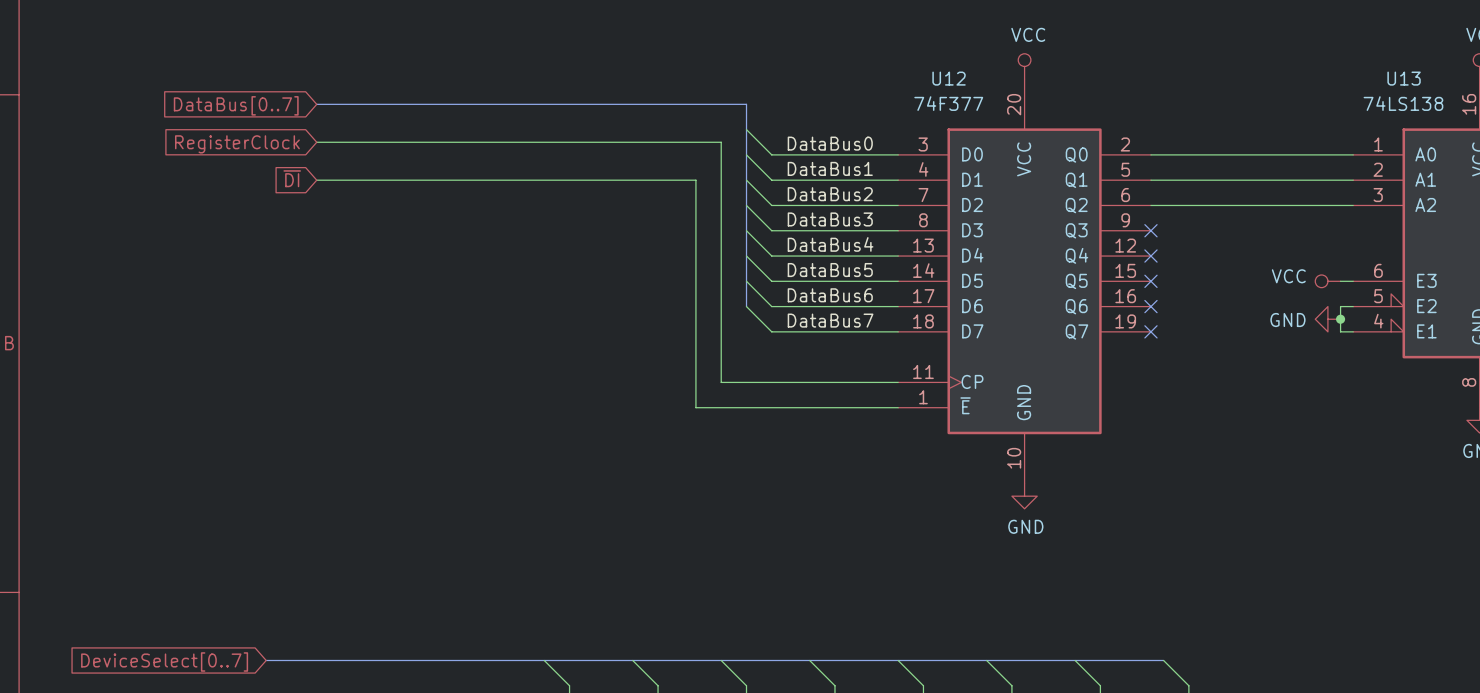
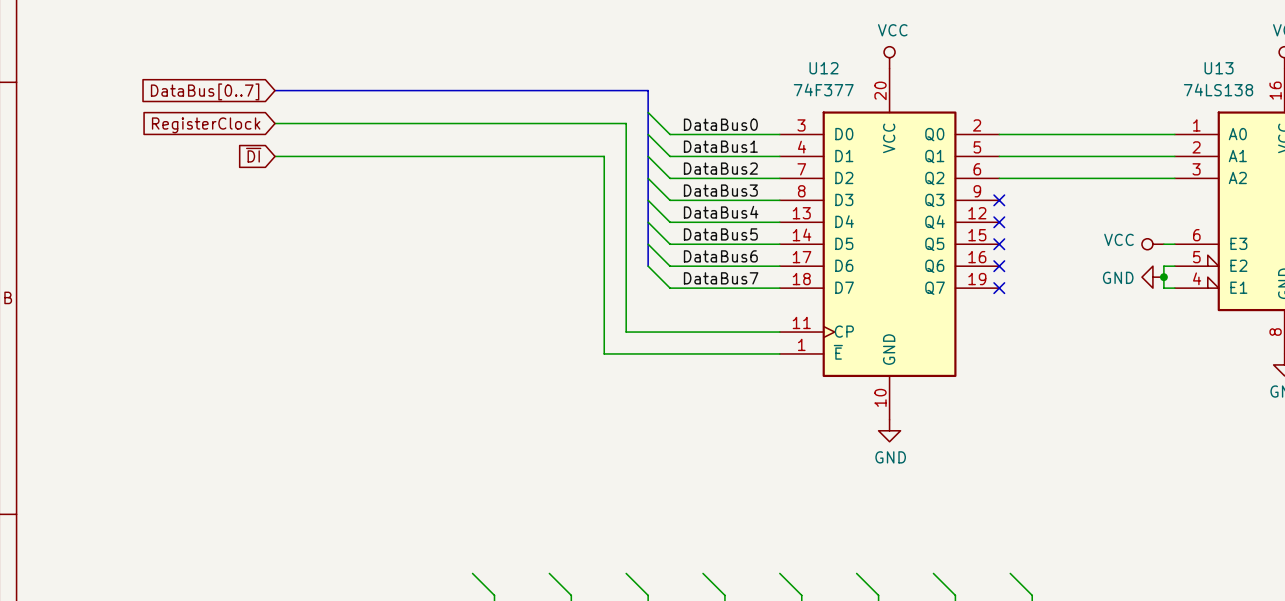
bus: (266, 660) (1163, 660) -> none
global label: DeviceSelect[0..7] (164, 662) -> none

